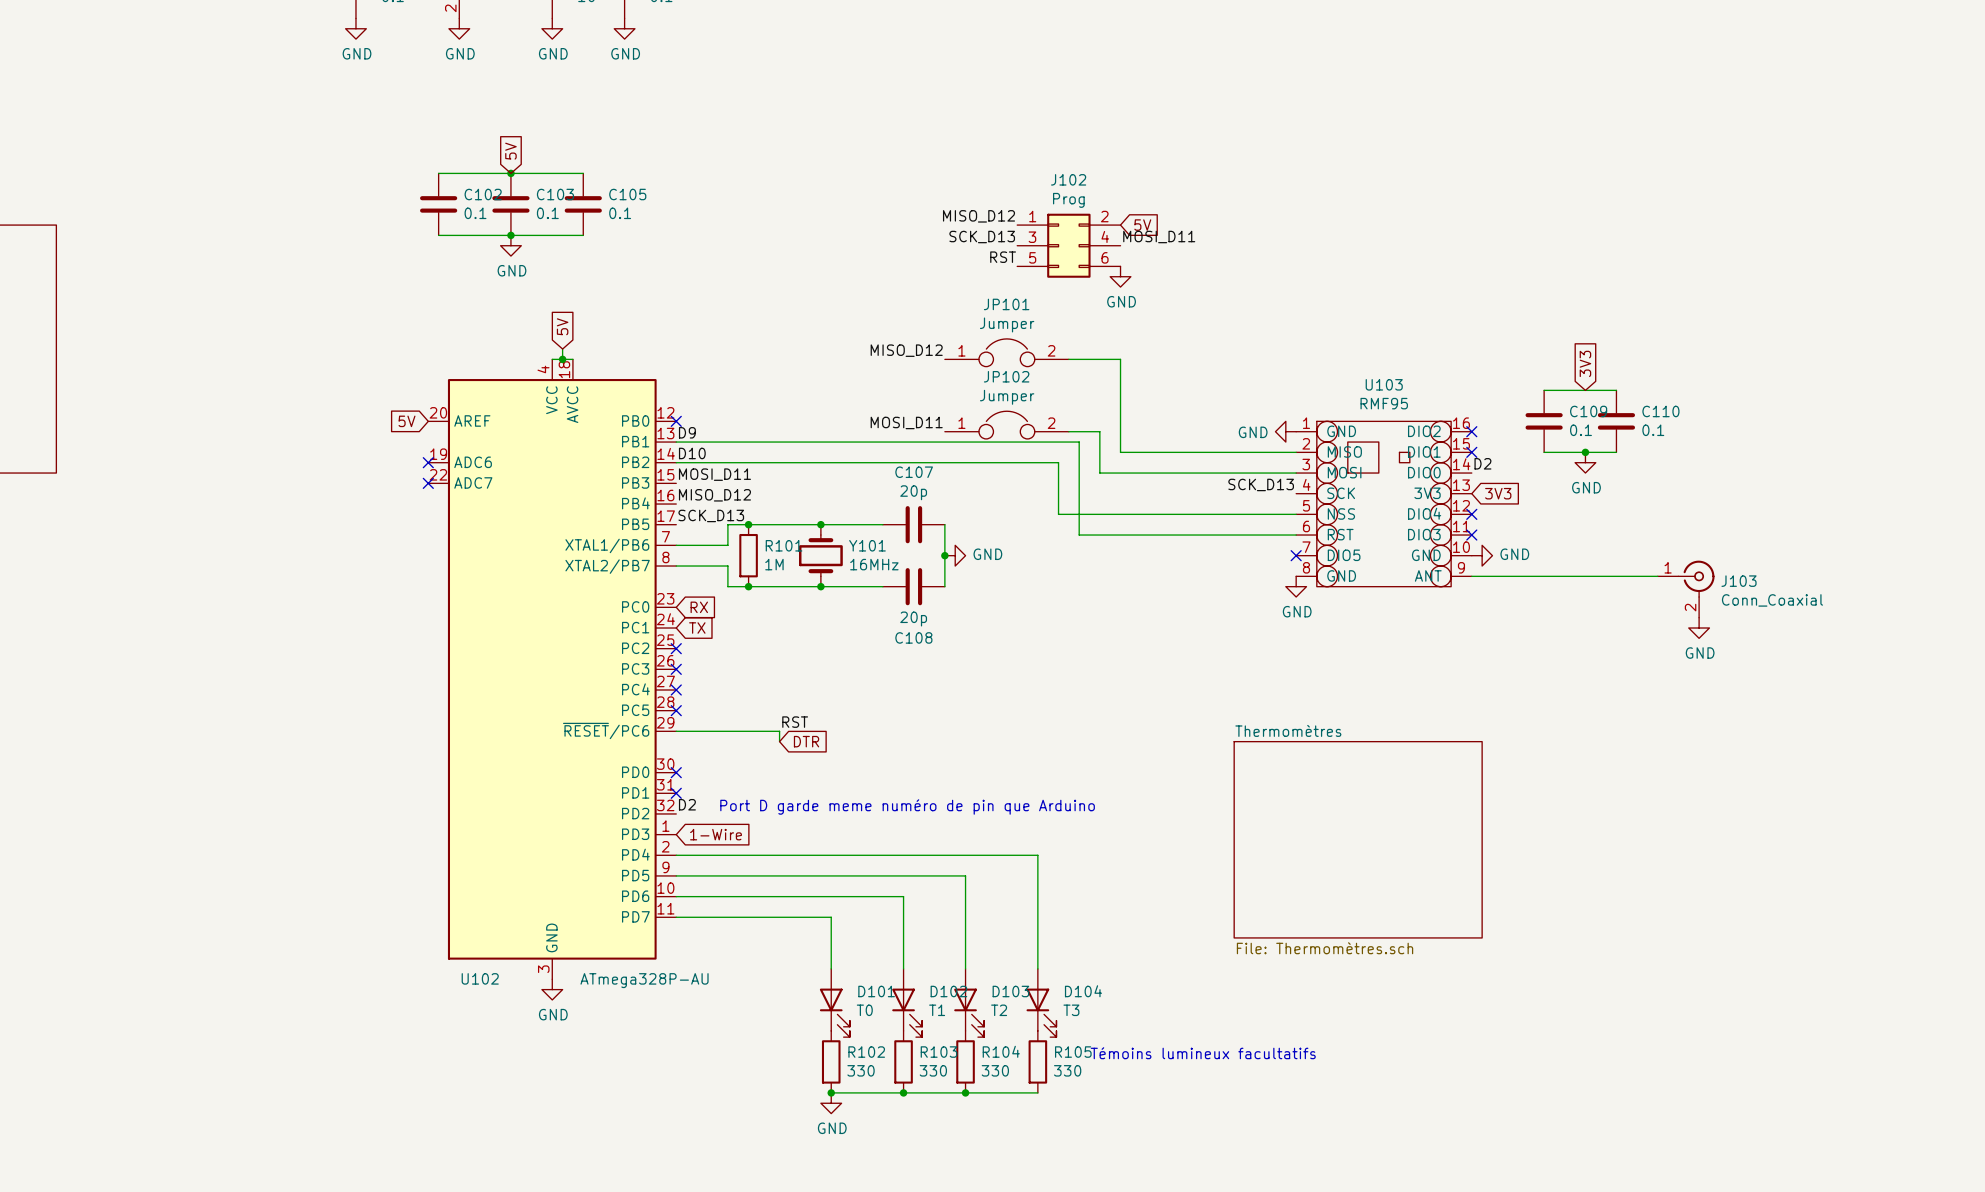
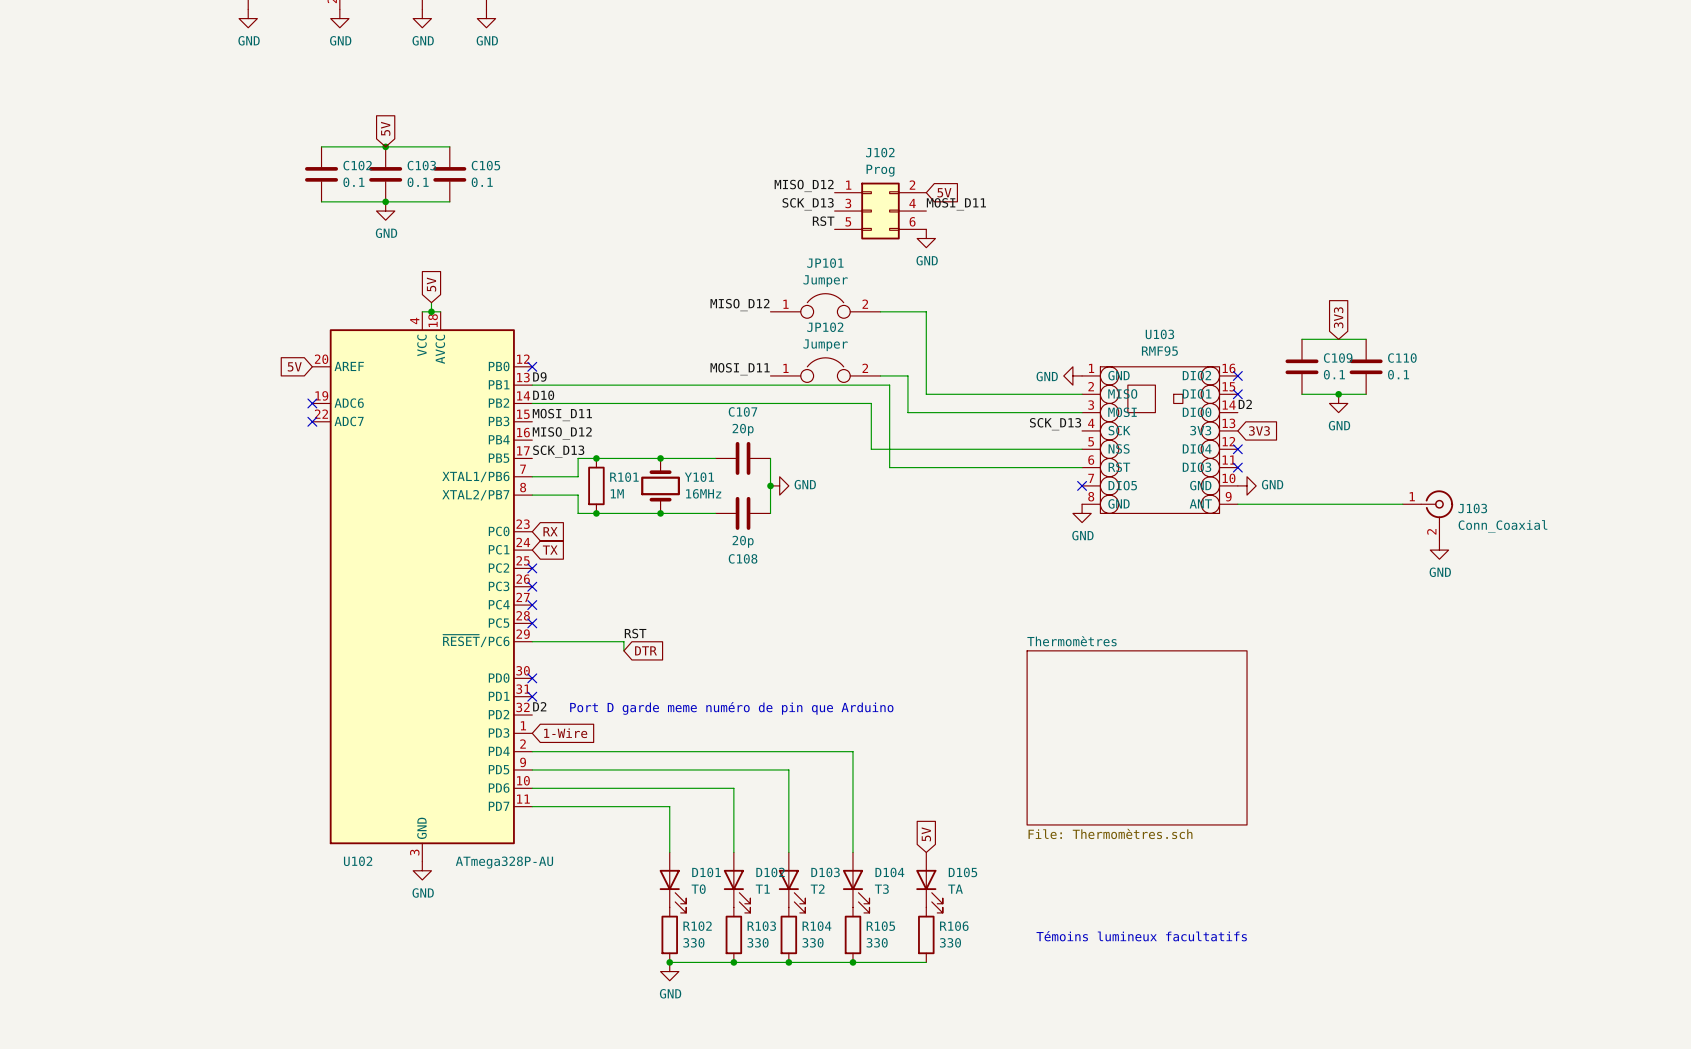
global label: none -> 5V (926, 834)
D105: none -> TA (929, 882)
text position: Témoins lumineux facultatifs (1203, 1053) -> Témoins lumineux facultatifs (1141, 936)
R106: none -> 330 (926, 934)
wire: none -> (852, 962) (926, 962)
junction: none -> (852, 962)

